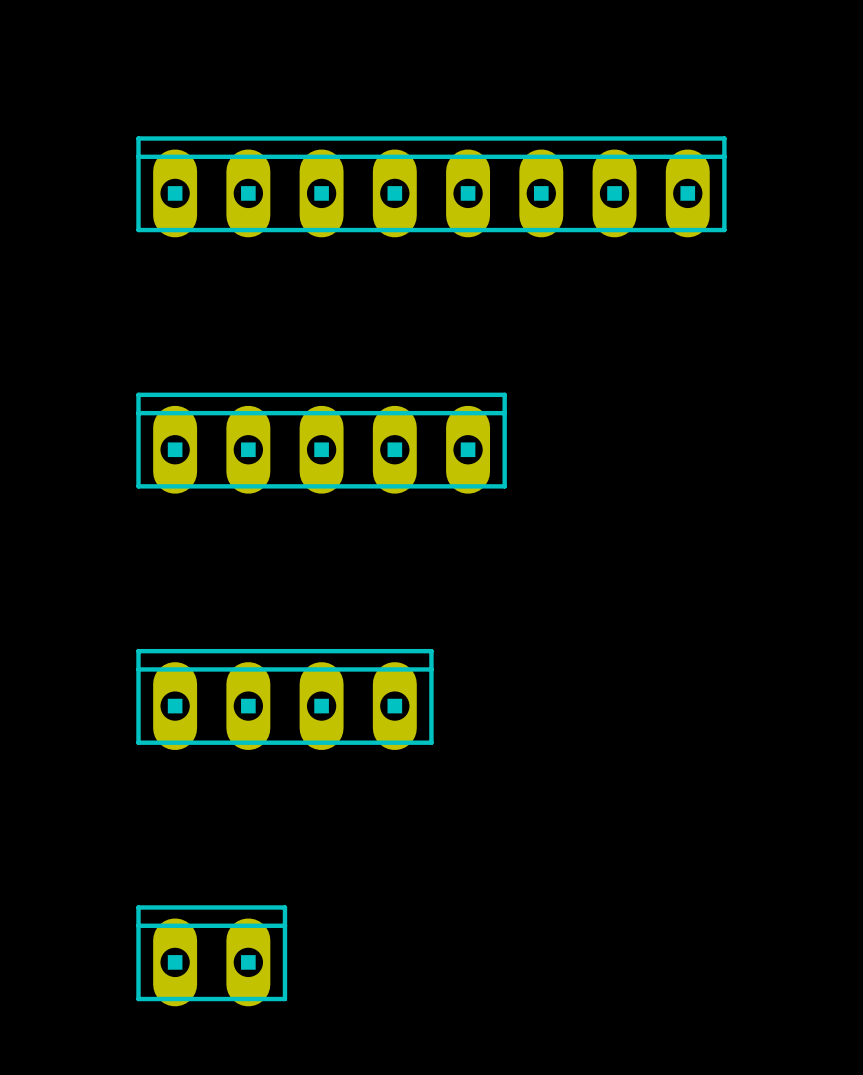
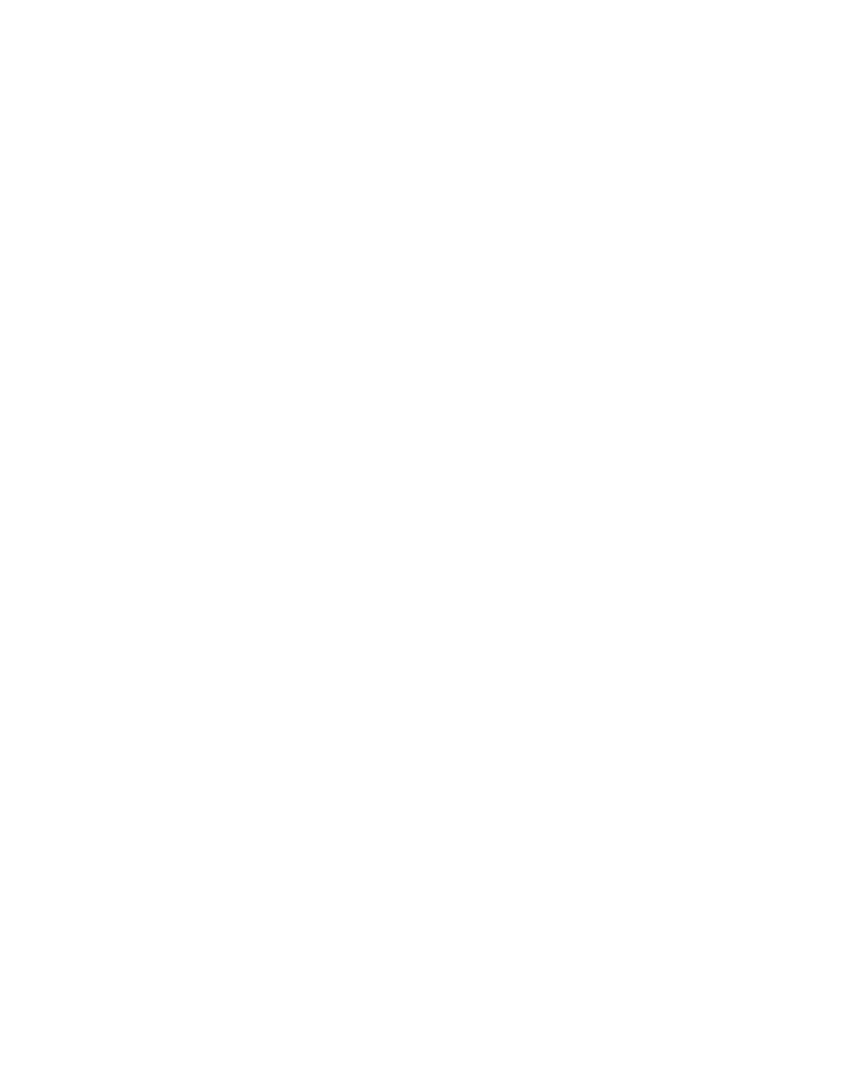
part: (431, 186) -> none
part: (321, 443) -> none
part: (284, 699) -> none
part: (211, 955) -> none

